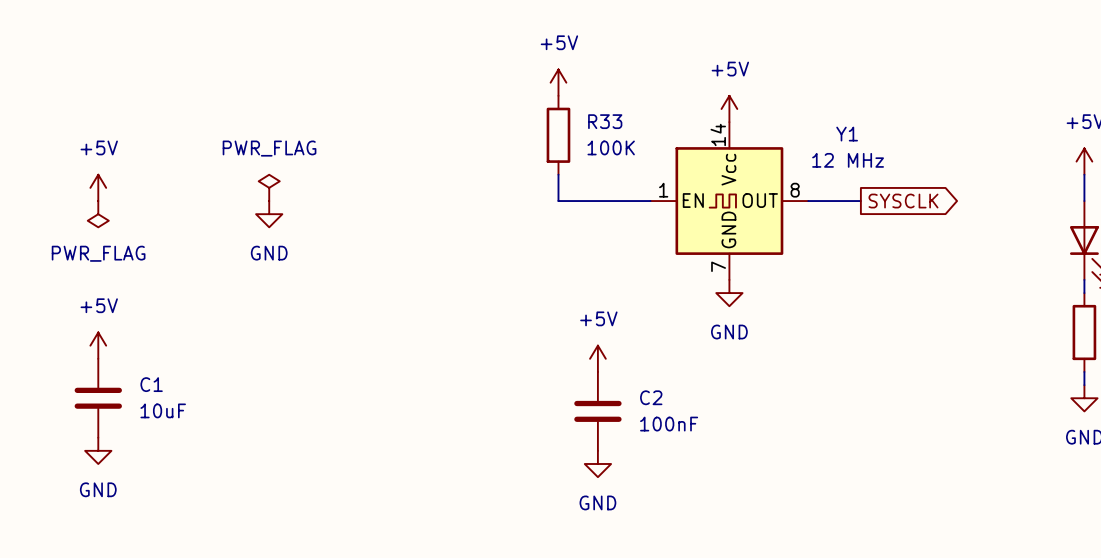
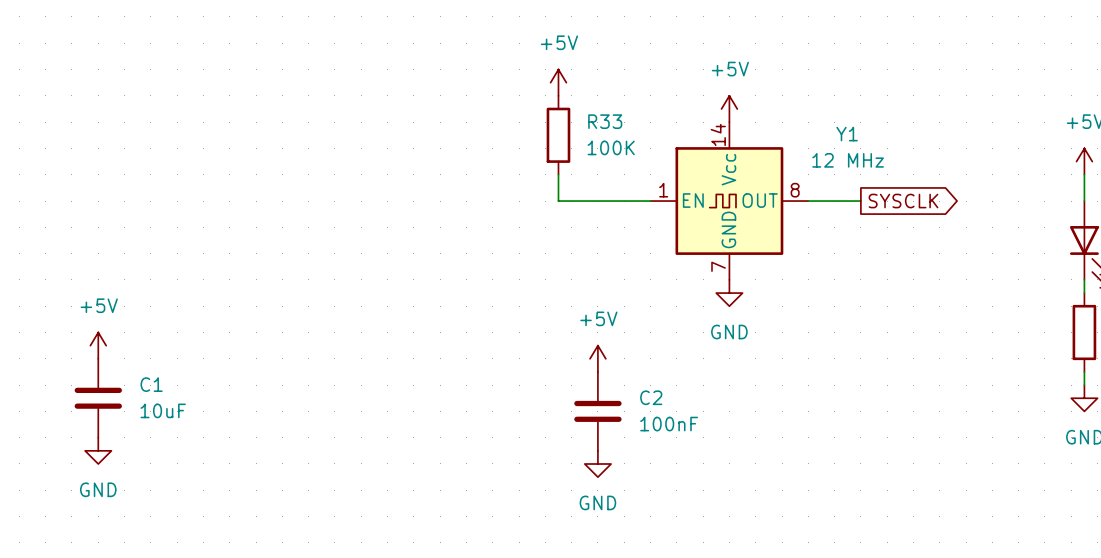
power symbol: +5V (98, 187) -> none
power symbol: PWR_FLAG (269, 187) -> none
power symbol: PWR_FLAG (98, 214) -> none
power symbol: GND (269, 214) -> none

